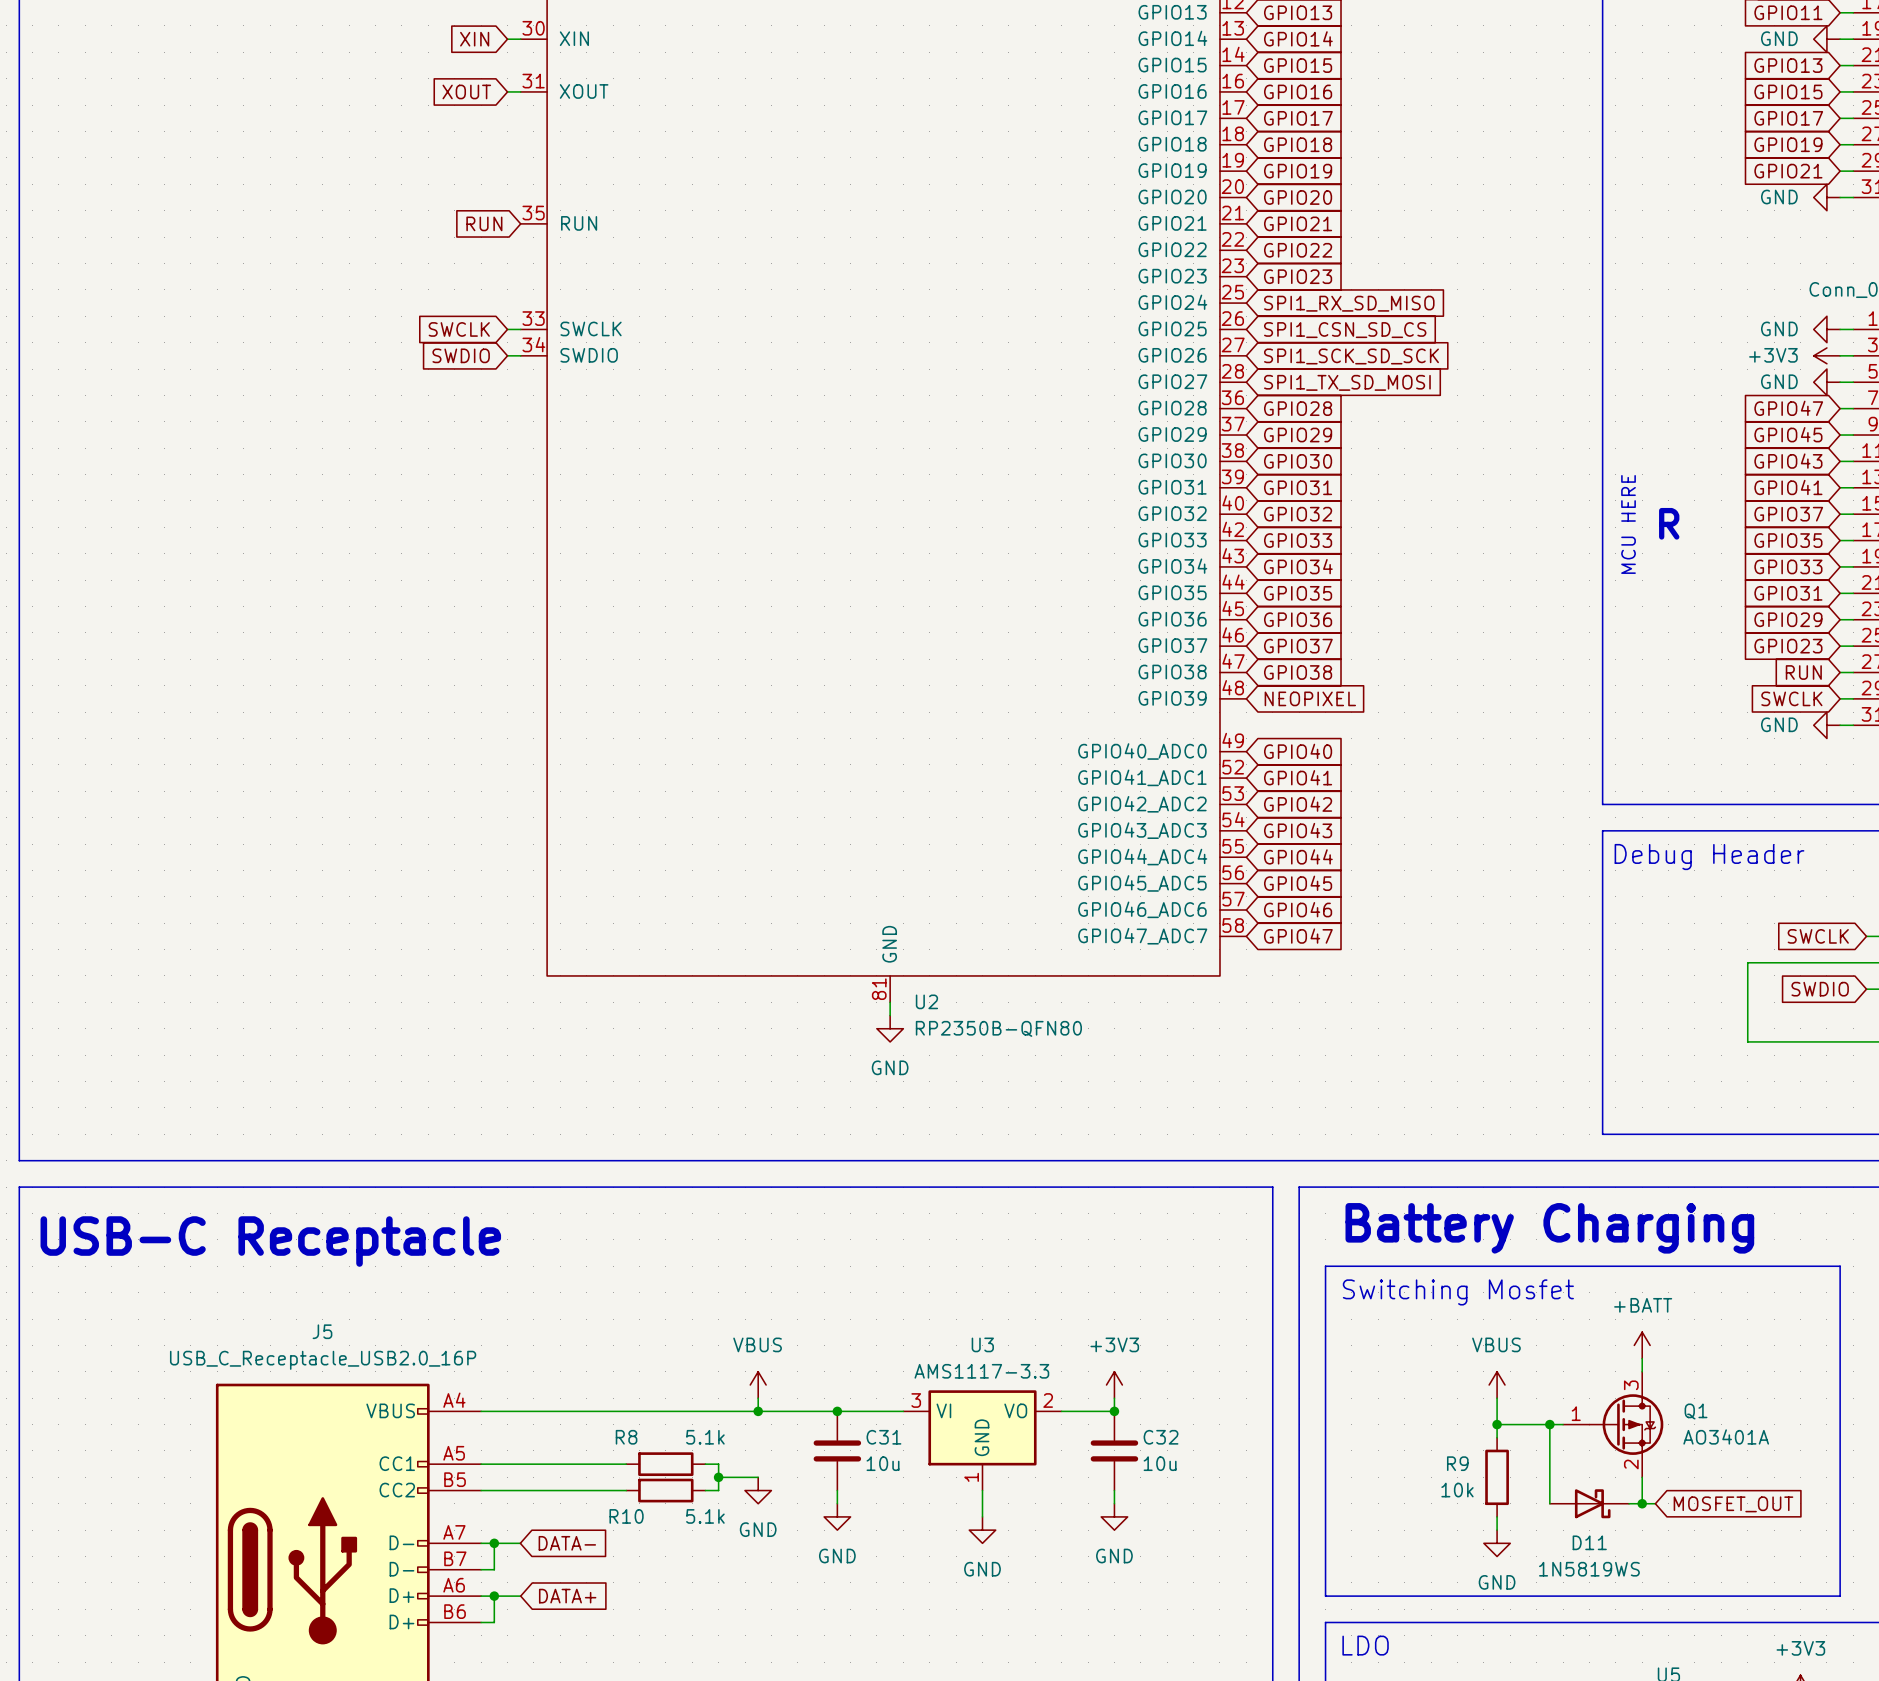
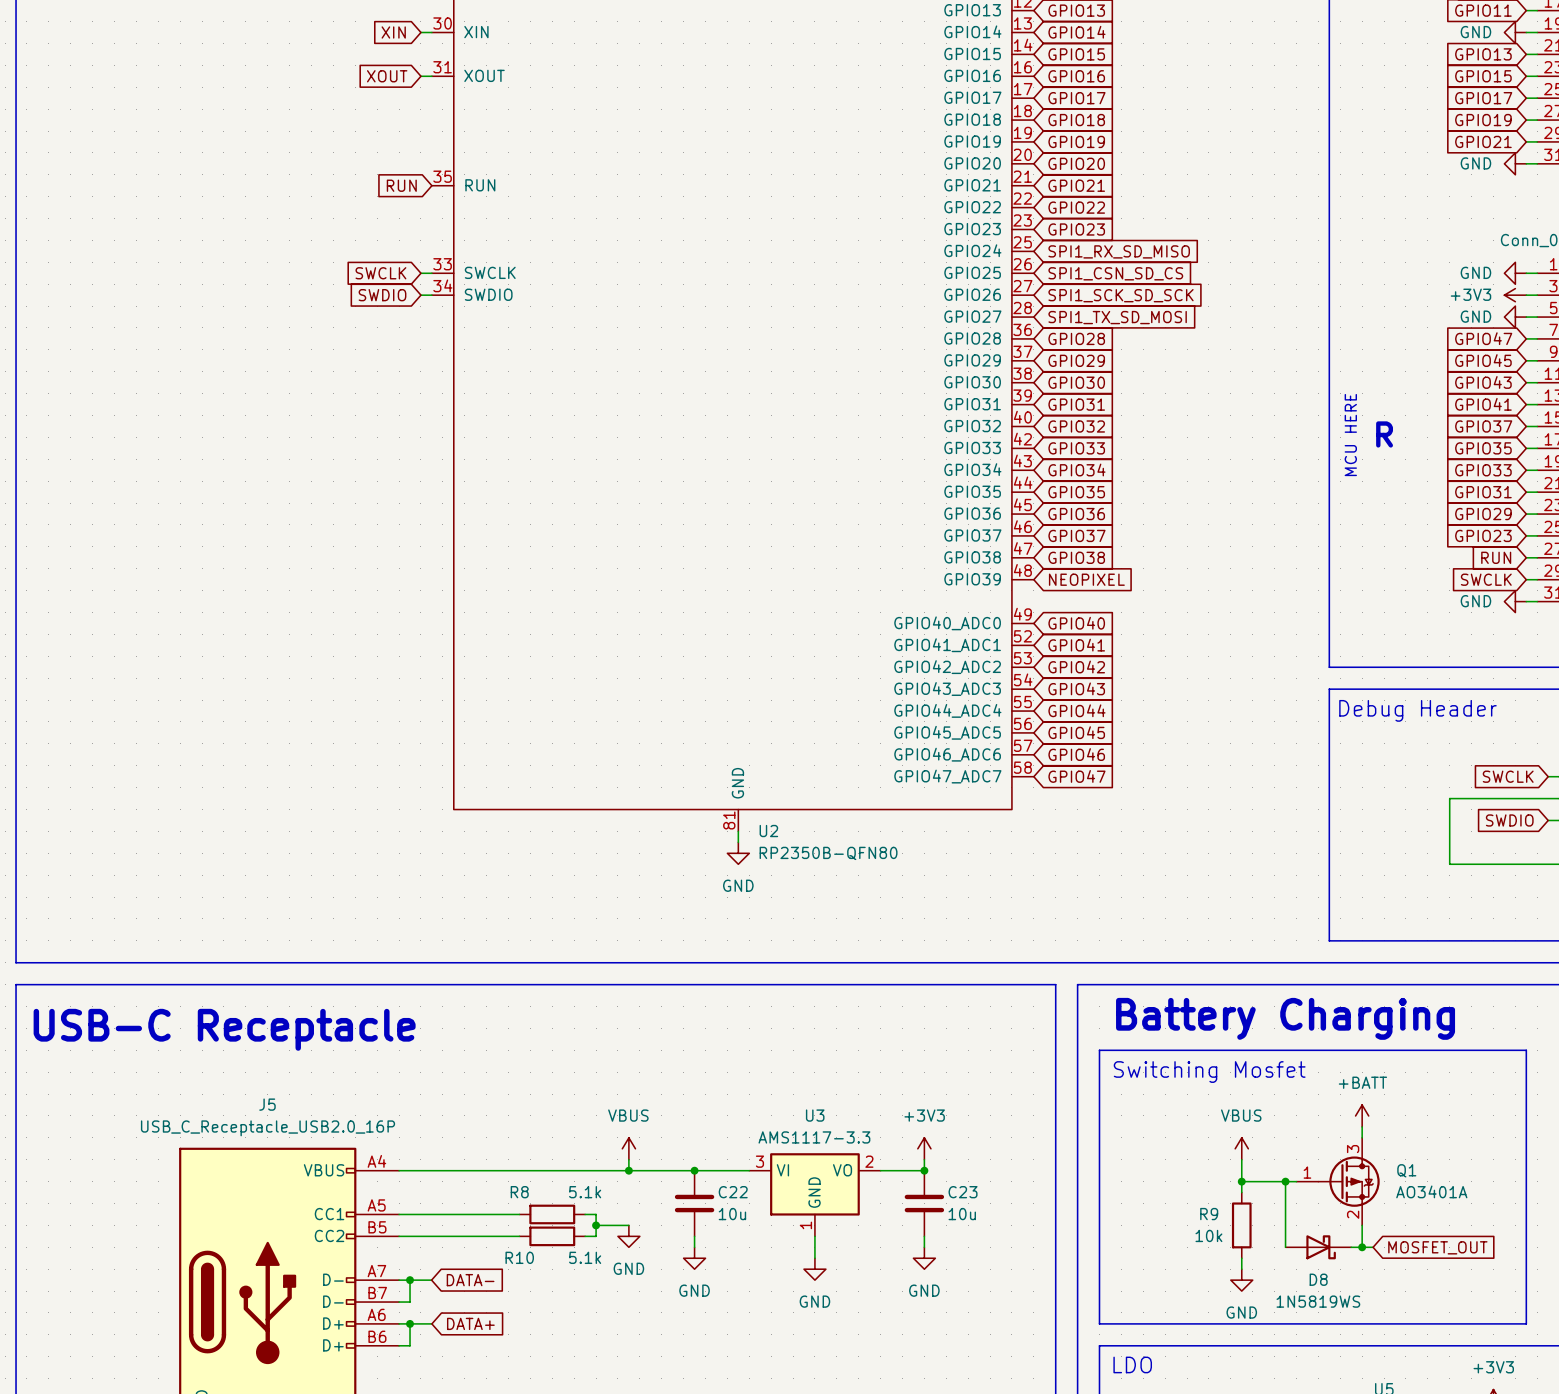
C31 name: C31 (883, 1437) -> C22 (733, 1192)
C32 name: C32 (1161, 1437) -> C23 (963, 1192)
D11 name: D11 (1589, 1542) -> D8 (1318, 1279)

